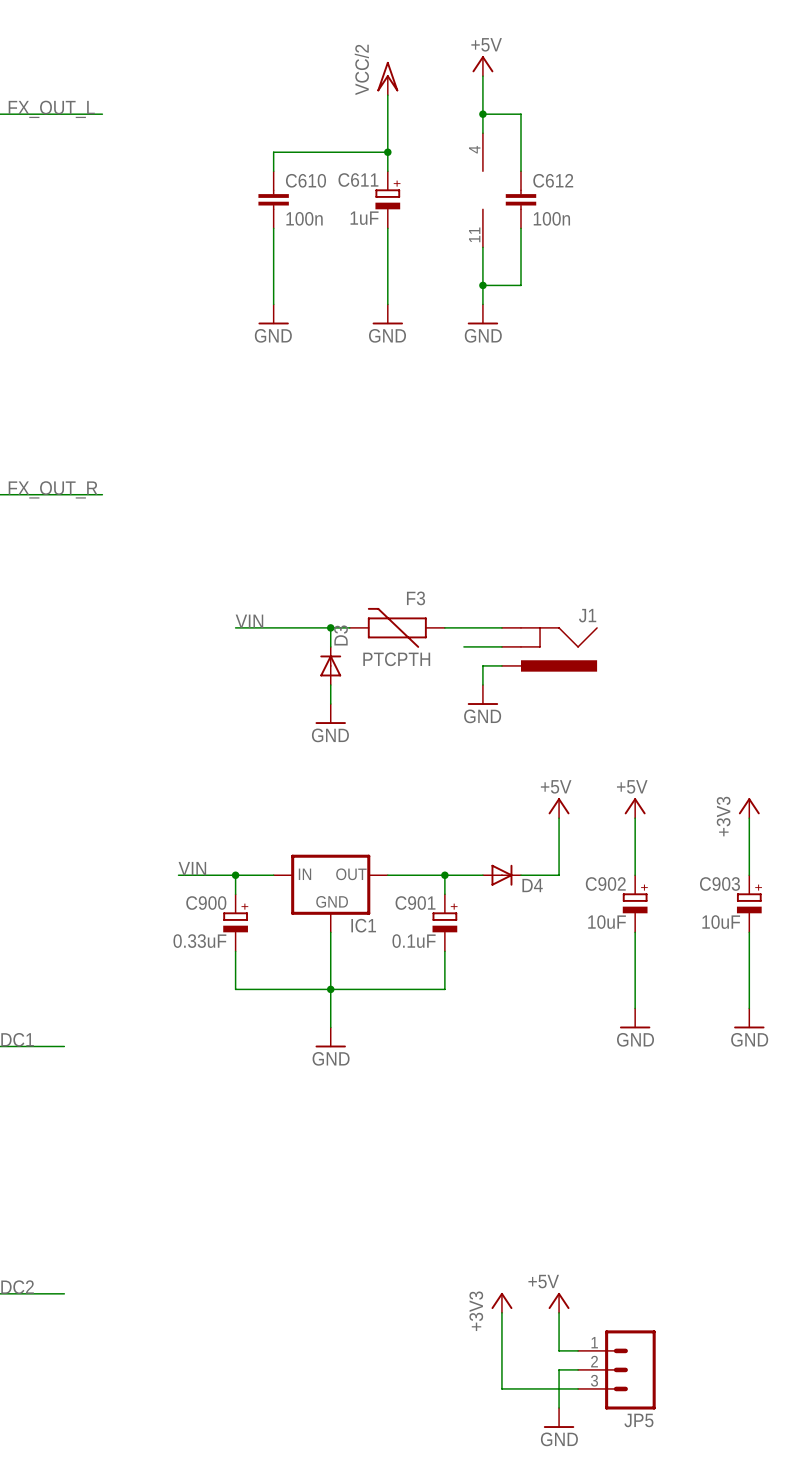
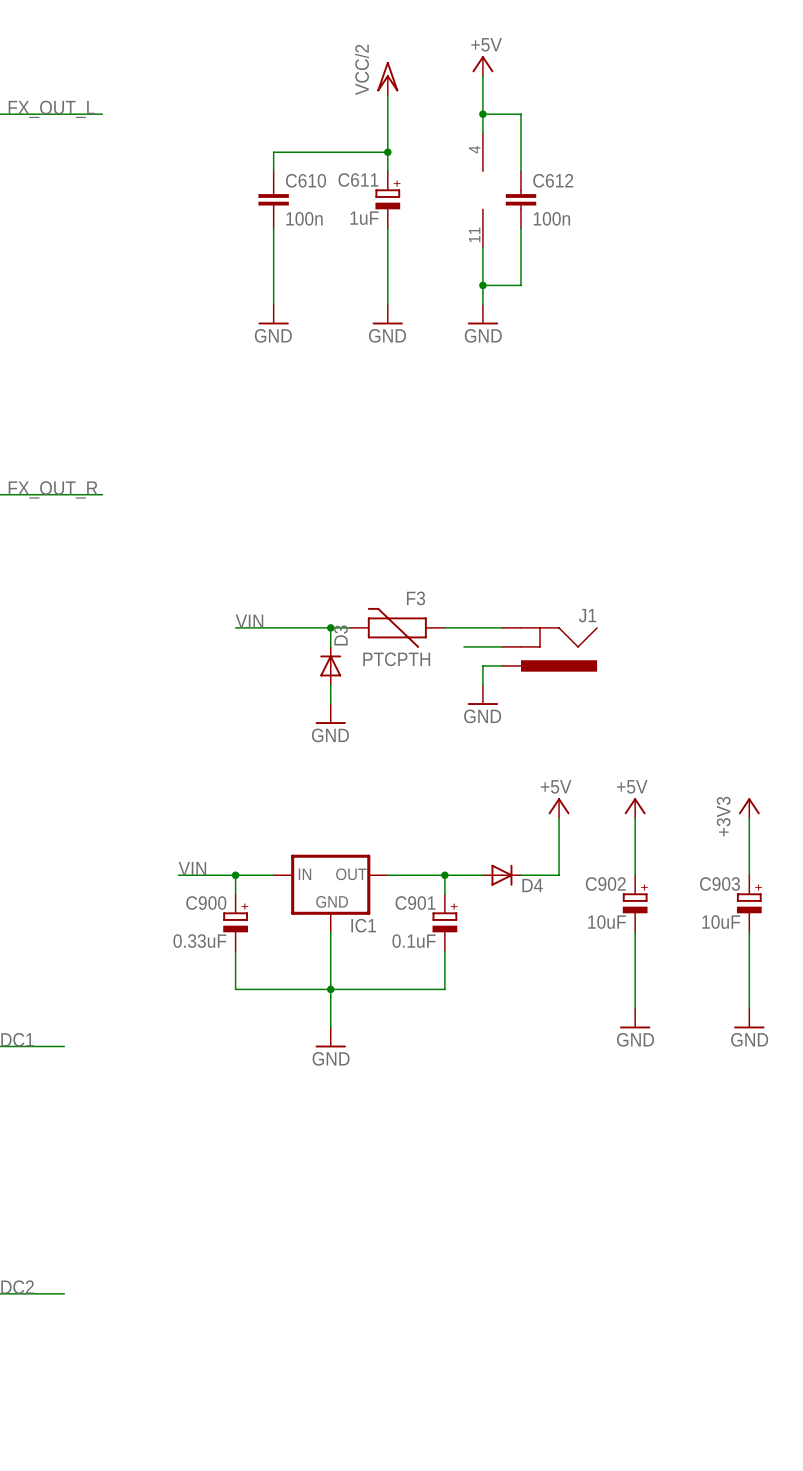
power symbol: +3V3 (501, 1302) -> none
power symbol: +5V (559, 1302) -> none
wire: (501, 1312) (501, 1388) (578, 1388) -> none
wire: (559, 1312) (559, 1350) (578, 1350) -> none
wire: (578, 1369) (559, 1369) (559, 1407) -> none
JP5: (616, 1369) -> none
power symbol: GND (559, 1417) -> none

